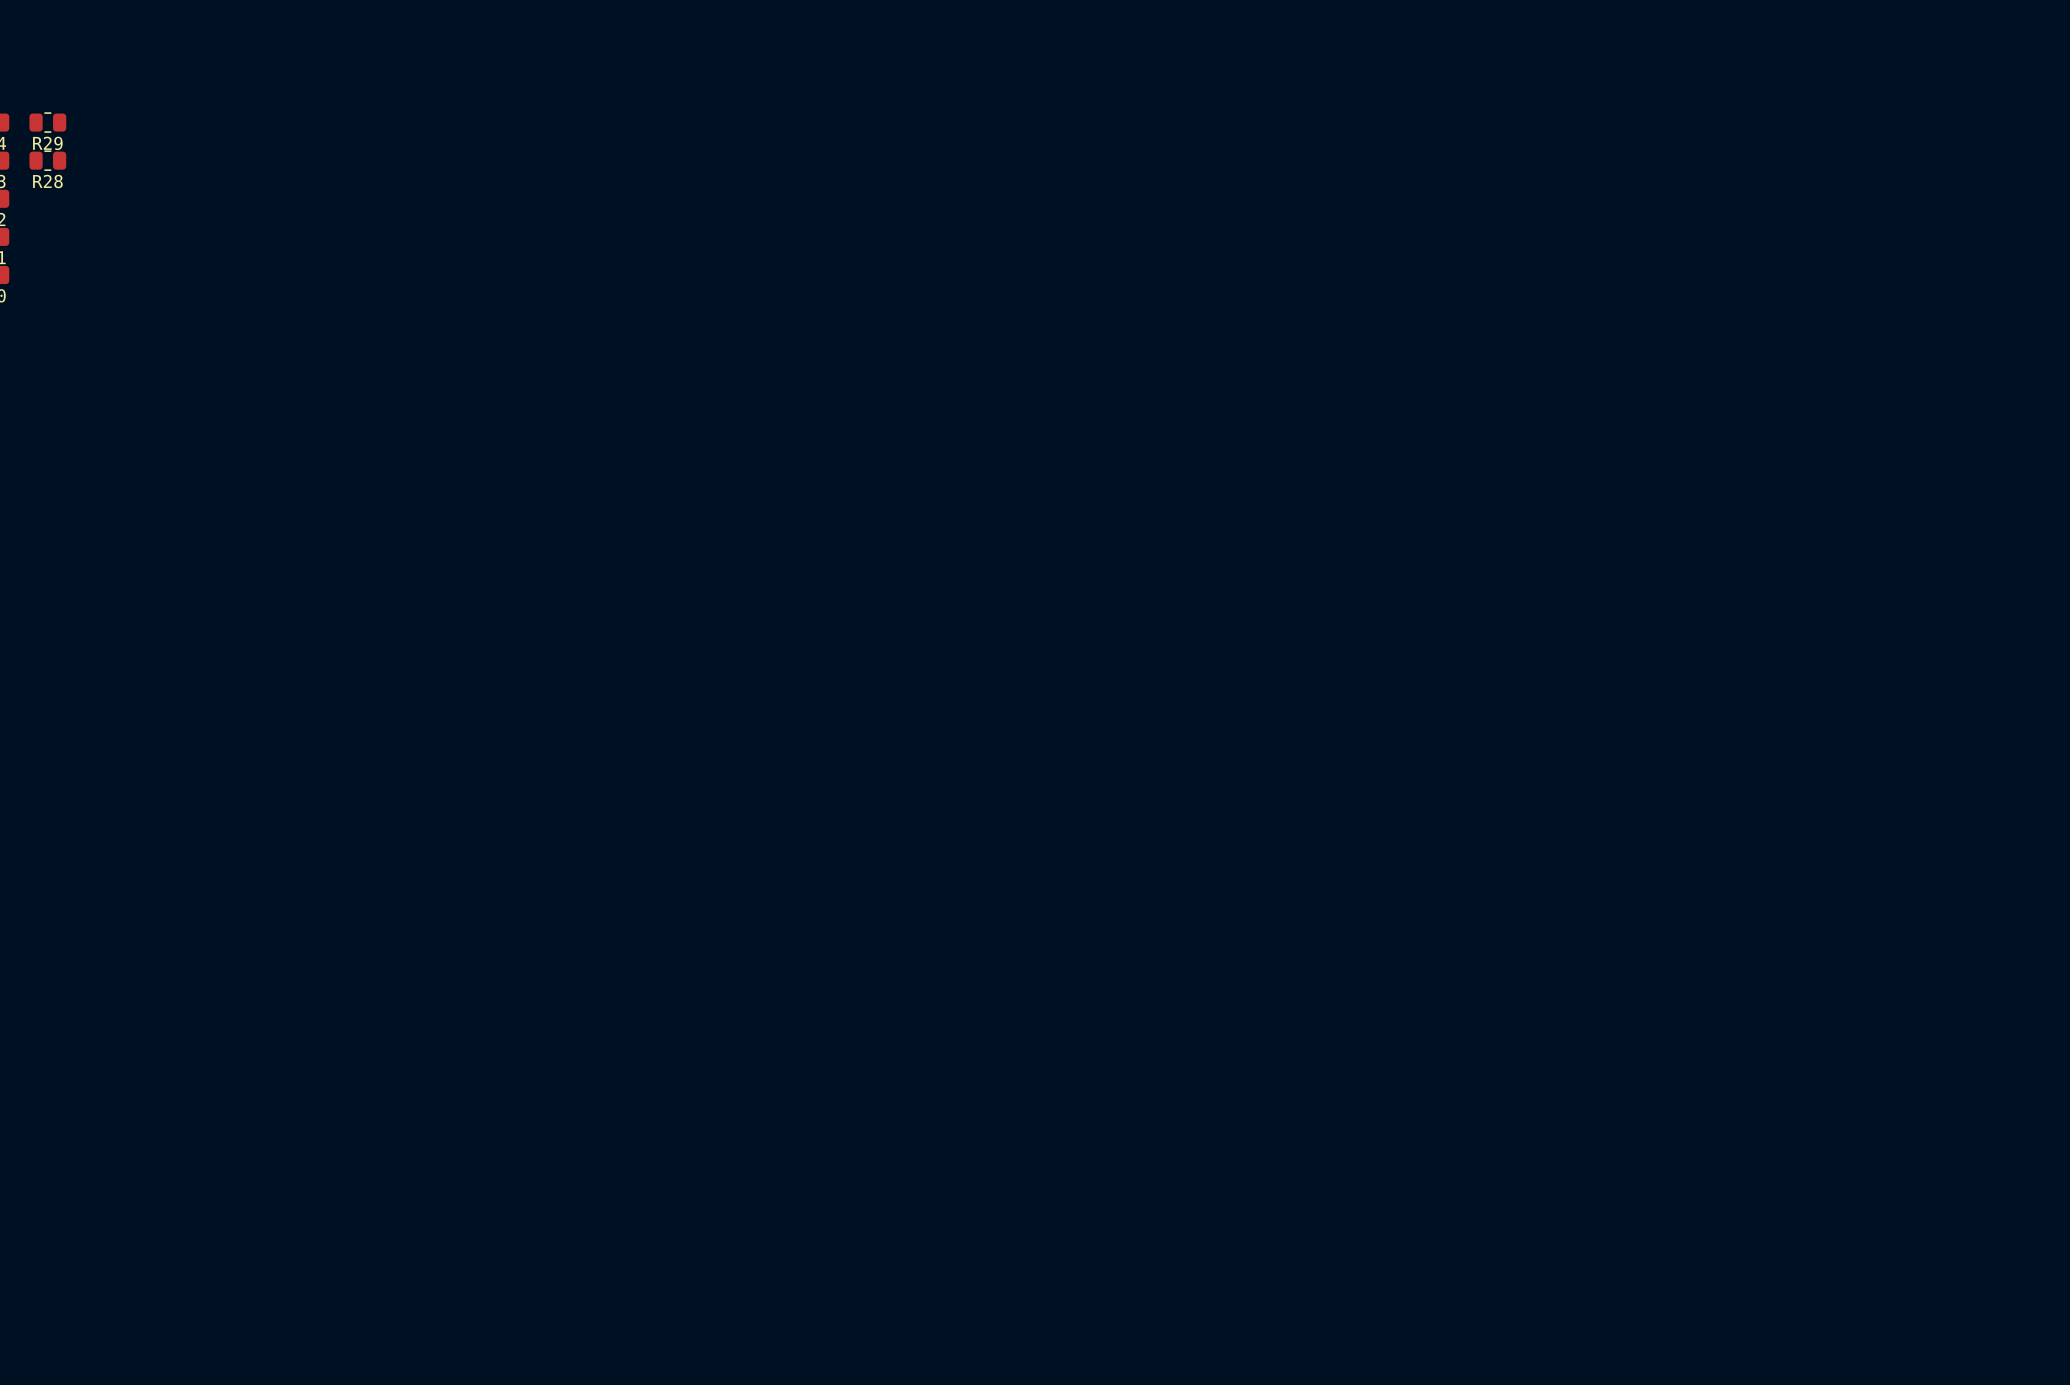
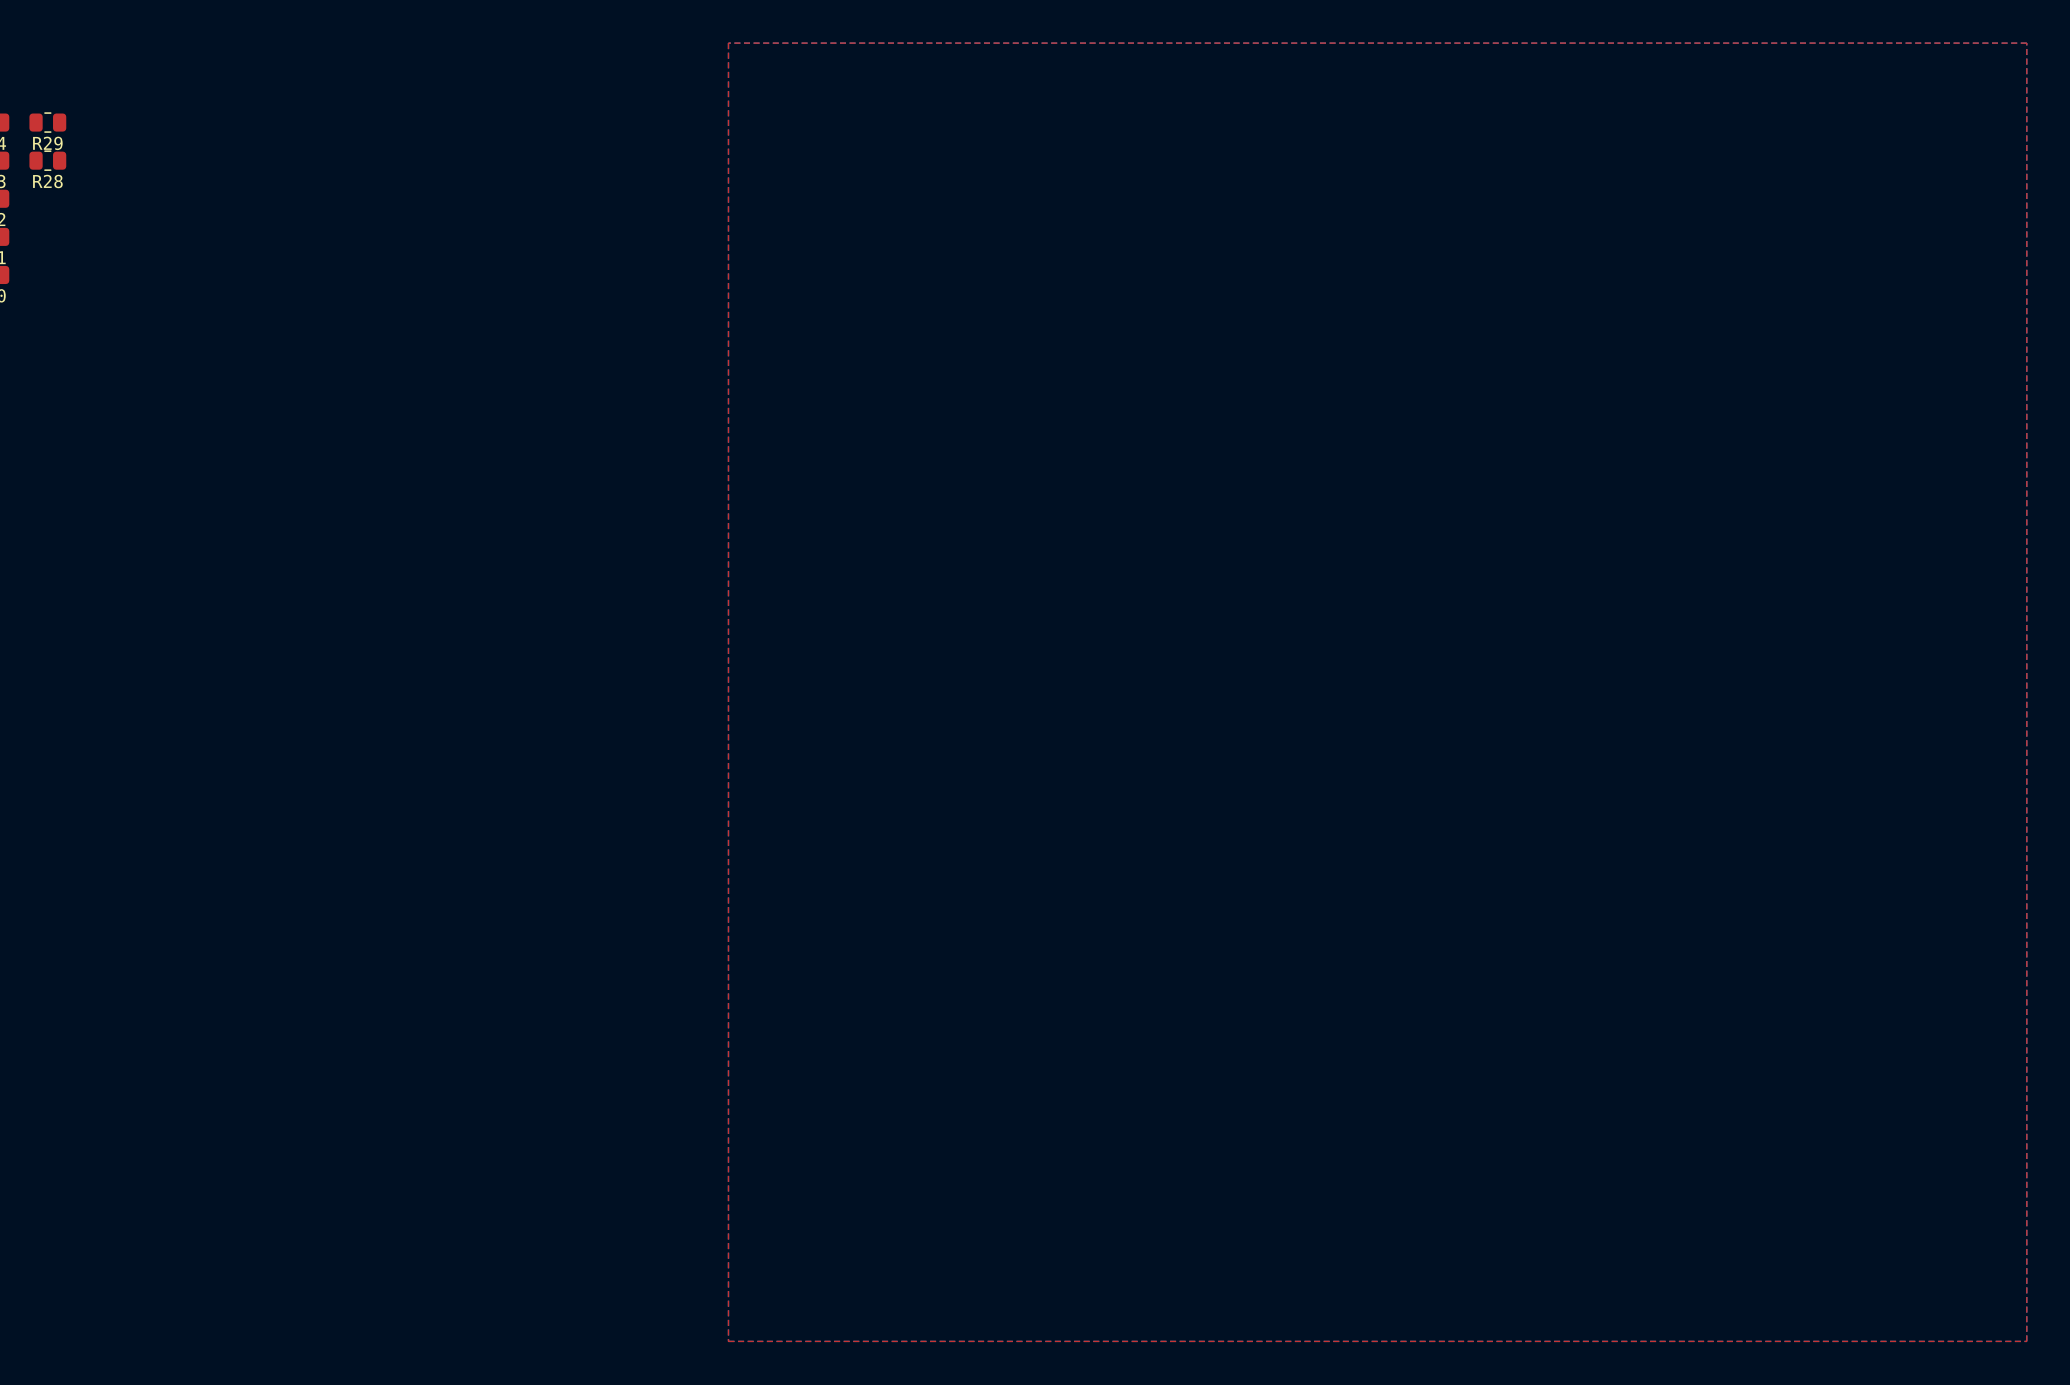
top zone outline: none -> (728, 43) (728, 1341) (2026, 1341) (2026, 43) (728, 43)

